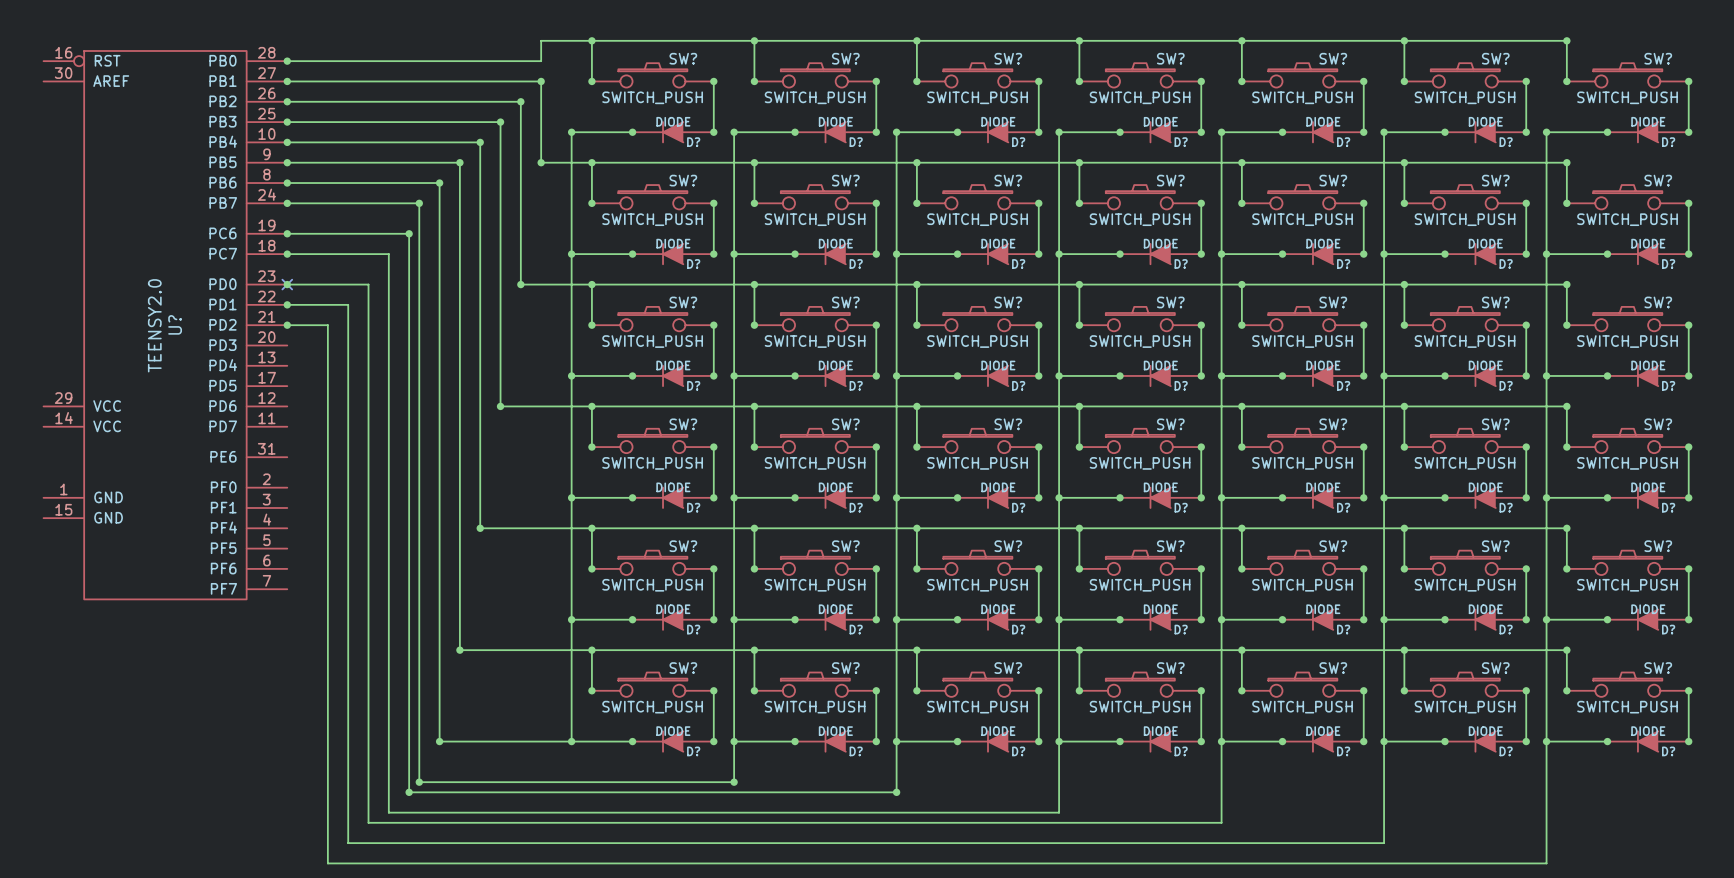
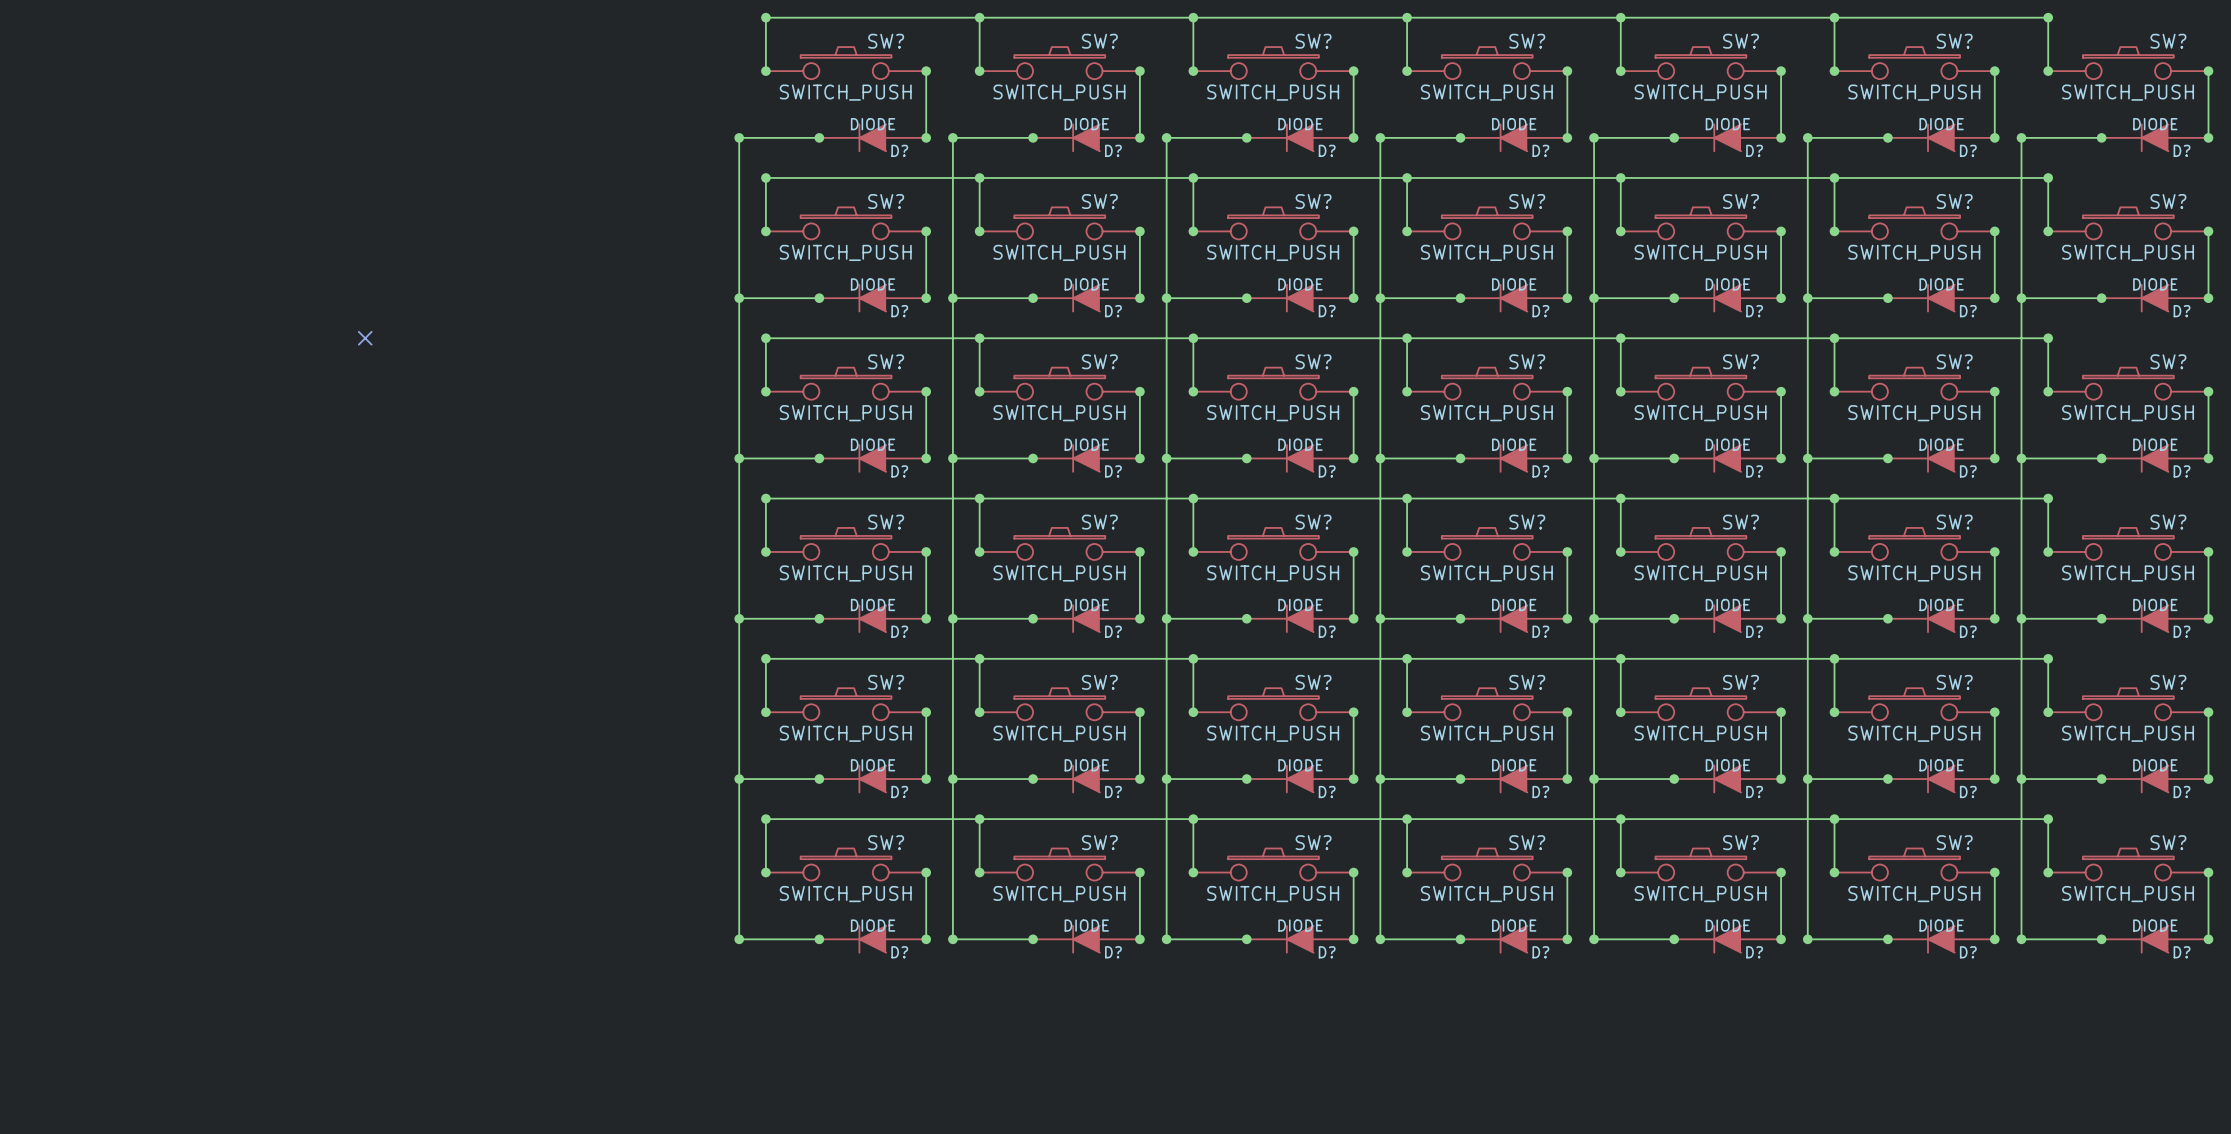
wire: (591, 40) (541, 40) (541, 61) (287, 61) -> none
junction: (287, 61) -> none
wire: (287, 81) (541, 81) (541, 162) (591, 162) -> none
junction: (287, 81) -> none
junction: (541, 81) -> none
wire: (287, 101) (520, 101) (520, 284) (591, 284) -> none
junction: (287, 101) -> none
junction: (520, 101) -> none
wire: (287, 122) (500, 122) (500, 406) (591, 406) -> none
junction: (287, 122) -> none
junction: (500, 122) -> none
wire: (287, 142) (480, 142) (480, 528) (591, 528) -> none
junction: (287, 142) -> none
junction: (480, 142) -> none
wire: (287, 162) (459, 162) (459, 650) (591, 650) -> none
junction: (287, 162) -> none
junction: (459, 162) -> none
junction: (541, 162) -> none
wire: (287, 183) (439, 183) (439, 741) (571, 741) -> none
junction: (287, 183) -> none
junction: (439, 183) -> none
wire: (287, 203) (419, 203) (419, 782) (734, 782) (734, 741) -> none
junction: (287, 203) -> none
junction: (419, 203) -> none
wire: (287, 233) (409, 233) (409, 792) (896, 792) (896, 741) -> none
junction: (287, 233) -> none
junction: (409, 233) -> none
wire: (287, 254) (388, 254) (388, 812) (1059, 812) (1059, 741) -> none
junction: (287, 254) -> none
wire: (287, 284) (368, 284) (368, 822) (1221, 822) (1221, 741) -> none
junction: (287, 284) -> none
junction: (520, 284) -> none
wire: (287, 304) (348, 304) (348, 843) (1384, 843) (1384, 741) -> none
junction: (287, 304) -> none
U?: TEENSY2.0 (165, 325) -> none
wire: (287, 325) (327, 325) (327, 863) (1546, 863) (1546, 741) -> none
junction: (287, 325) -> none
junction: (500, 406) -> none
junction: (480, 528) -> none
junction: (459, 650) -> none
junction: (439, 741) -> none
junction: (419, 782) -> none
junction: (734, 782) -> none
junction: (409, 792) -> none
junction: (896, 792) -> none

